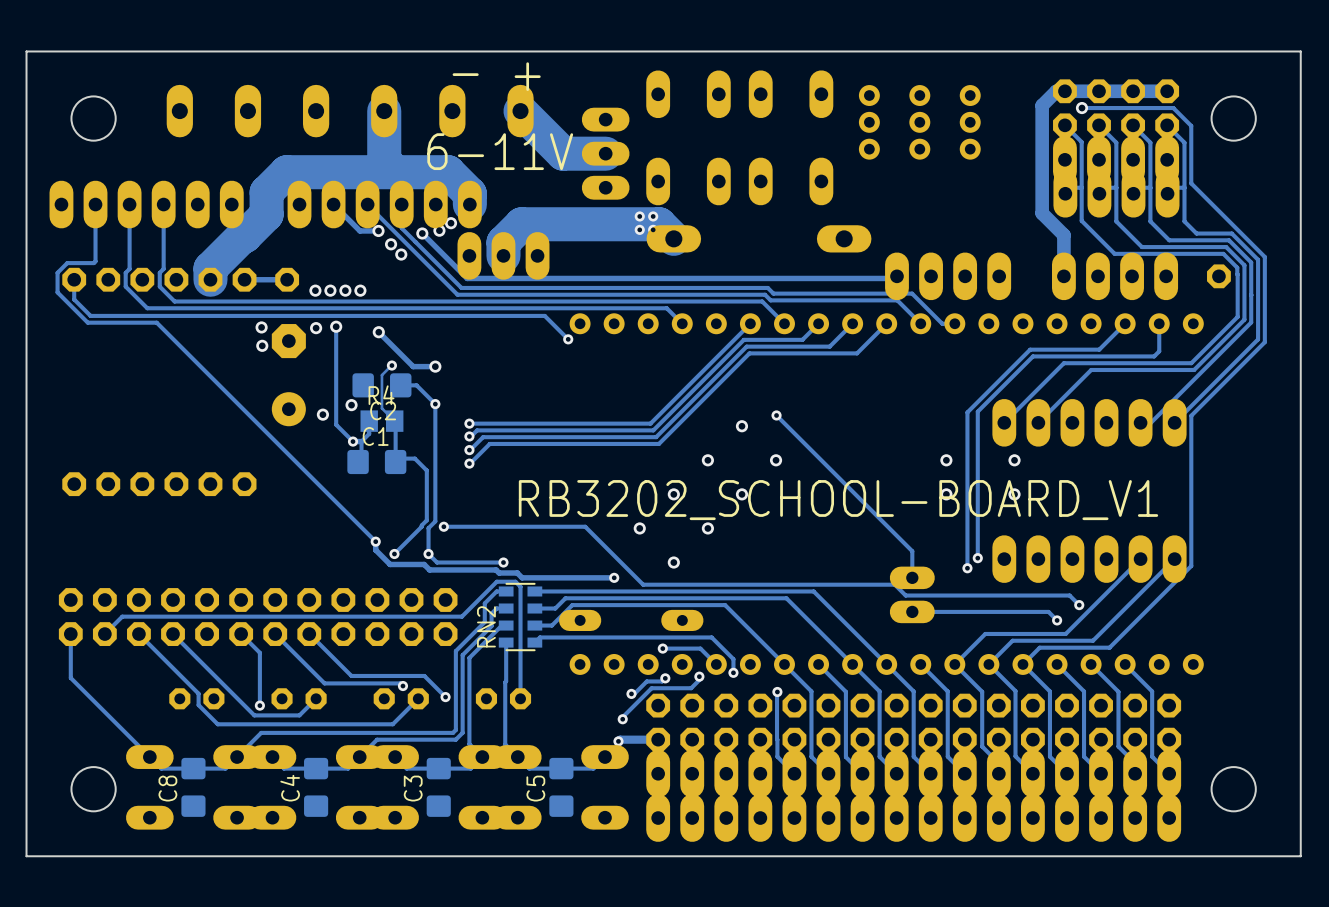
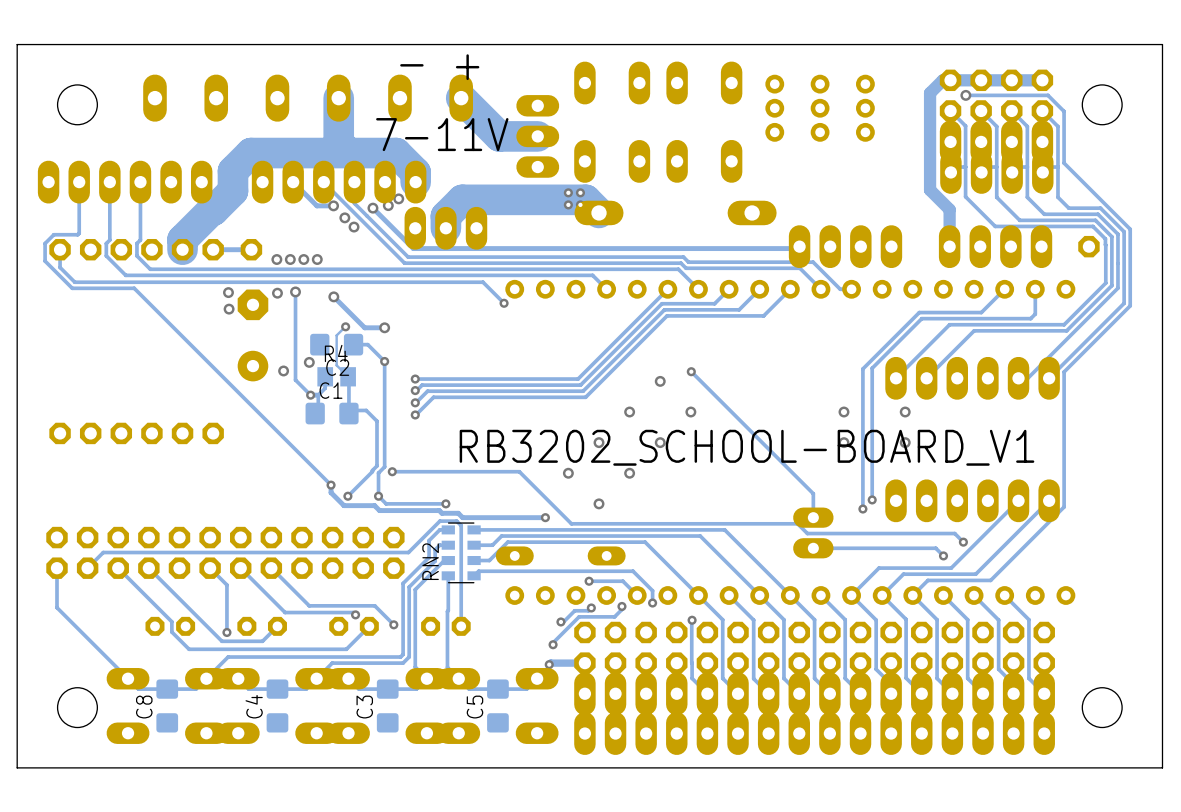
text: 6-11V (500, 151) -> 7-11V (442, 134)

